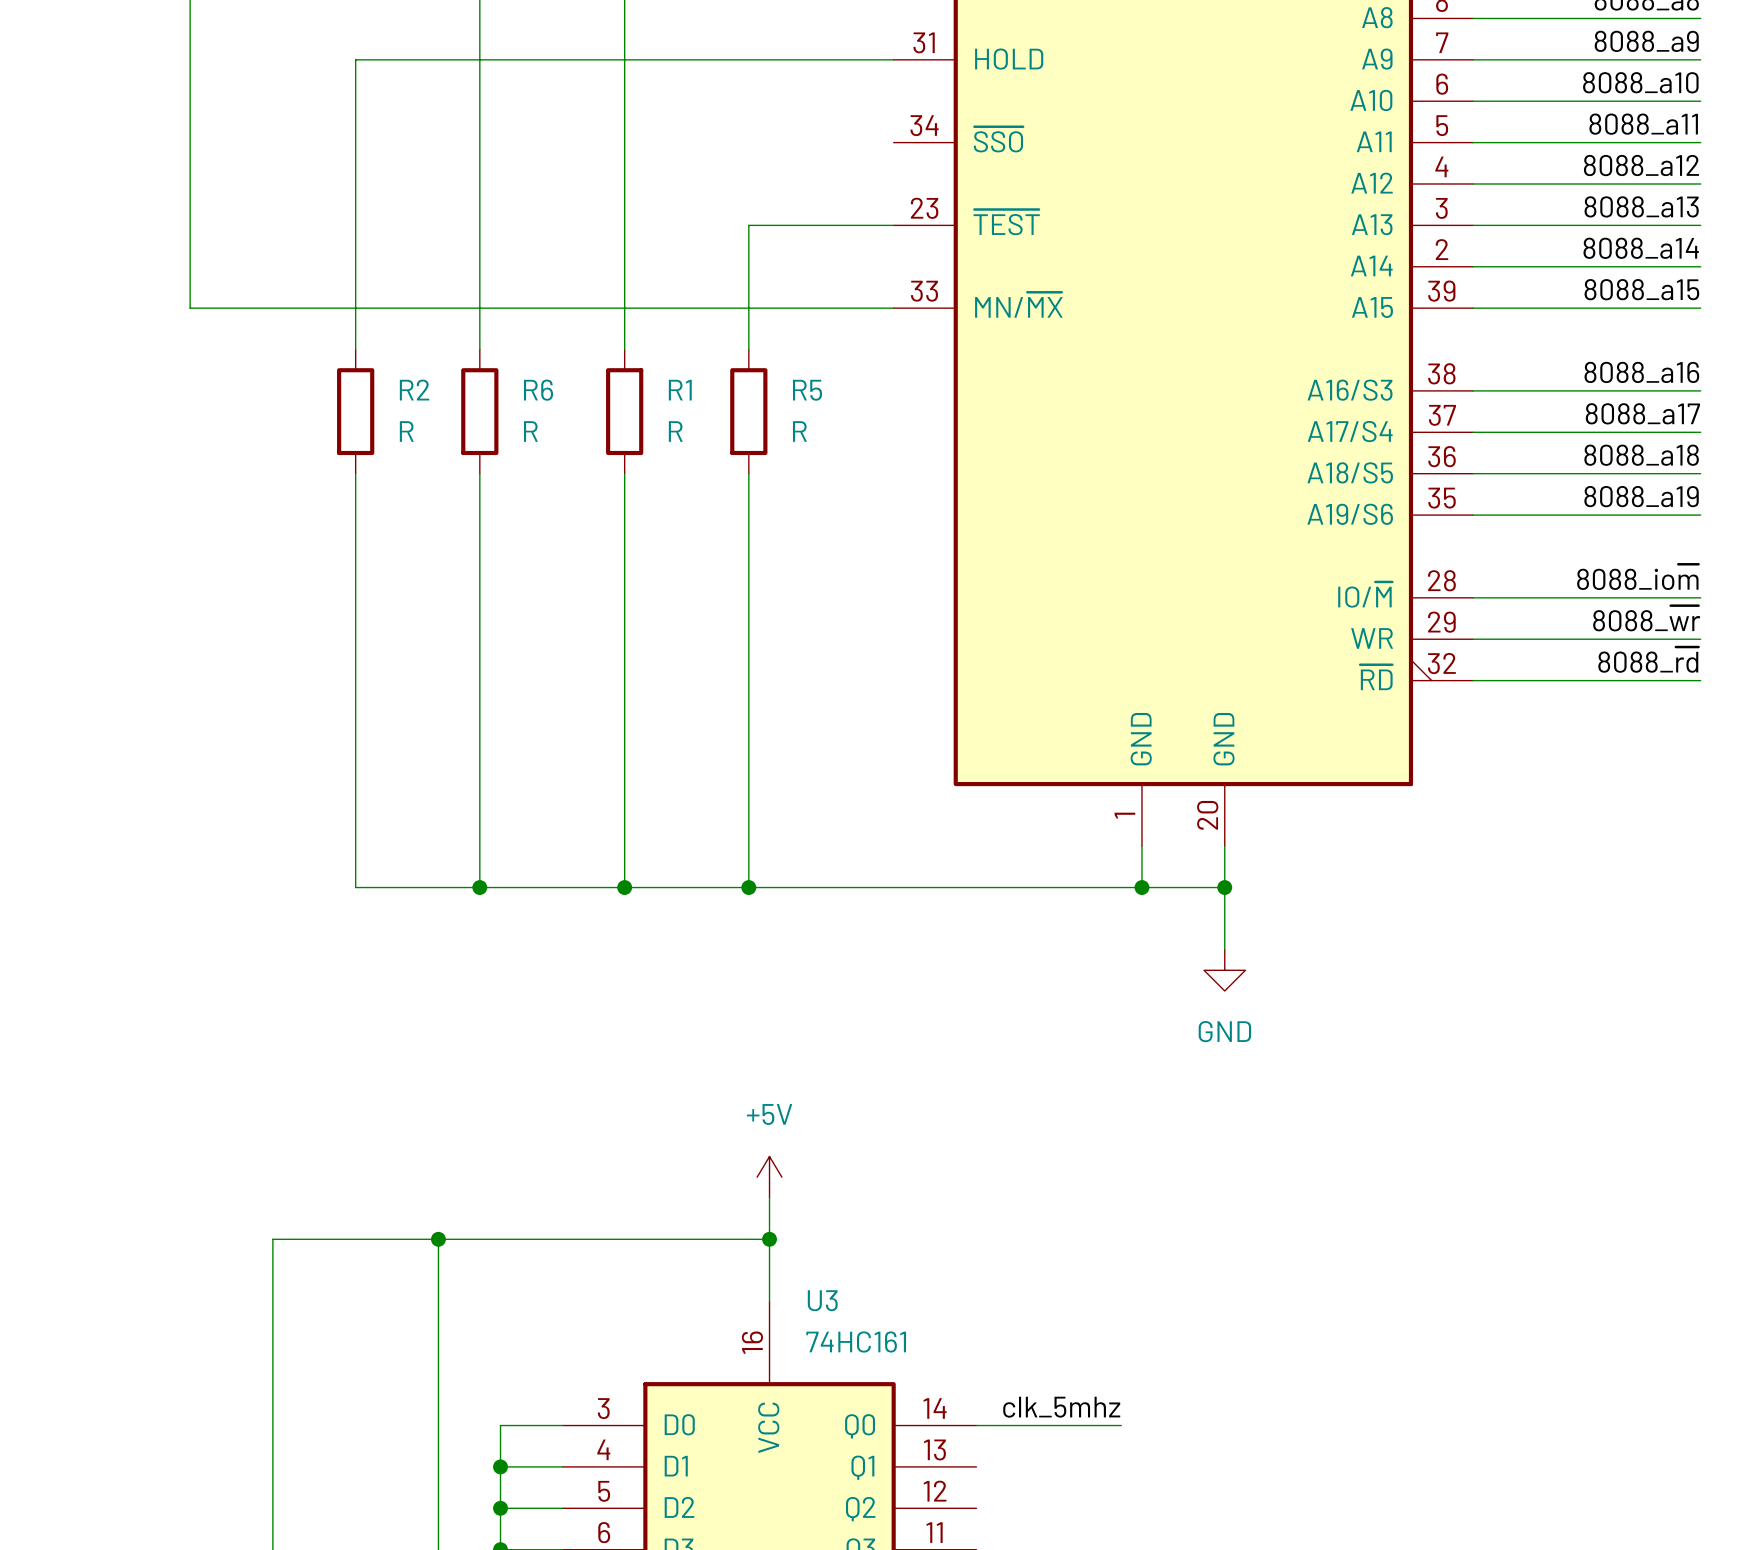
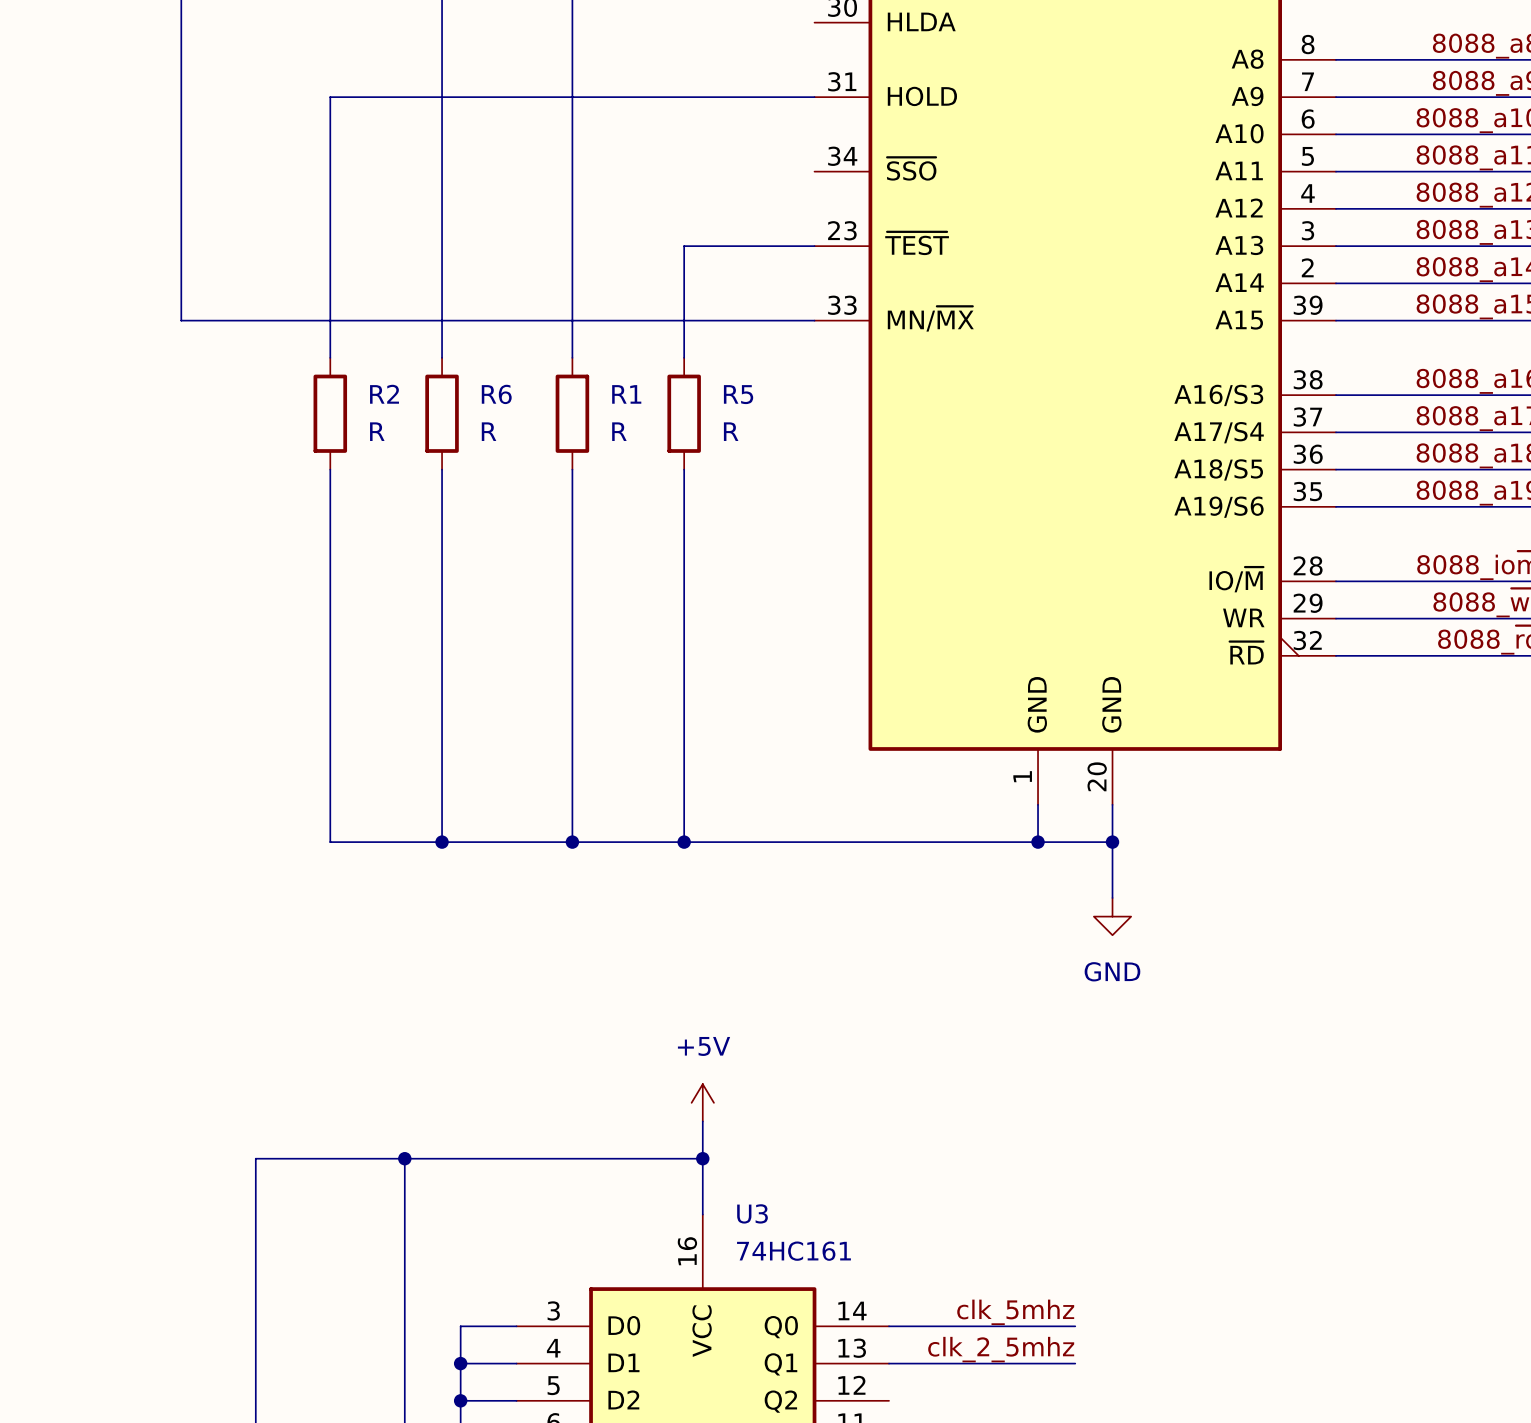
label position: clk_5mhz (1061, 1407) -> clk_5mhz (1015, 1312)
wire: none -> (1019, 1326) (1075, 1326)
label: none -> clk_2_5mhz (1001, 1349)
wire: none -> (889, 1363) (1075, 1363)

